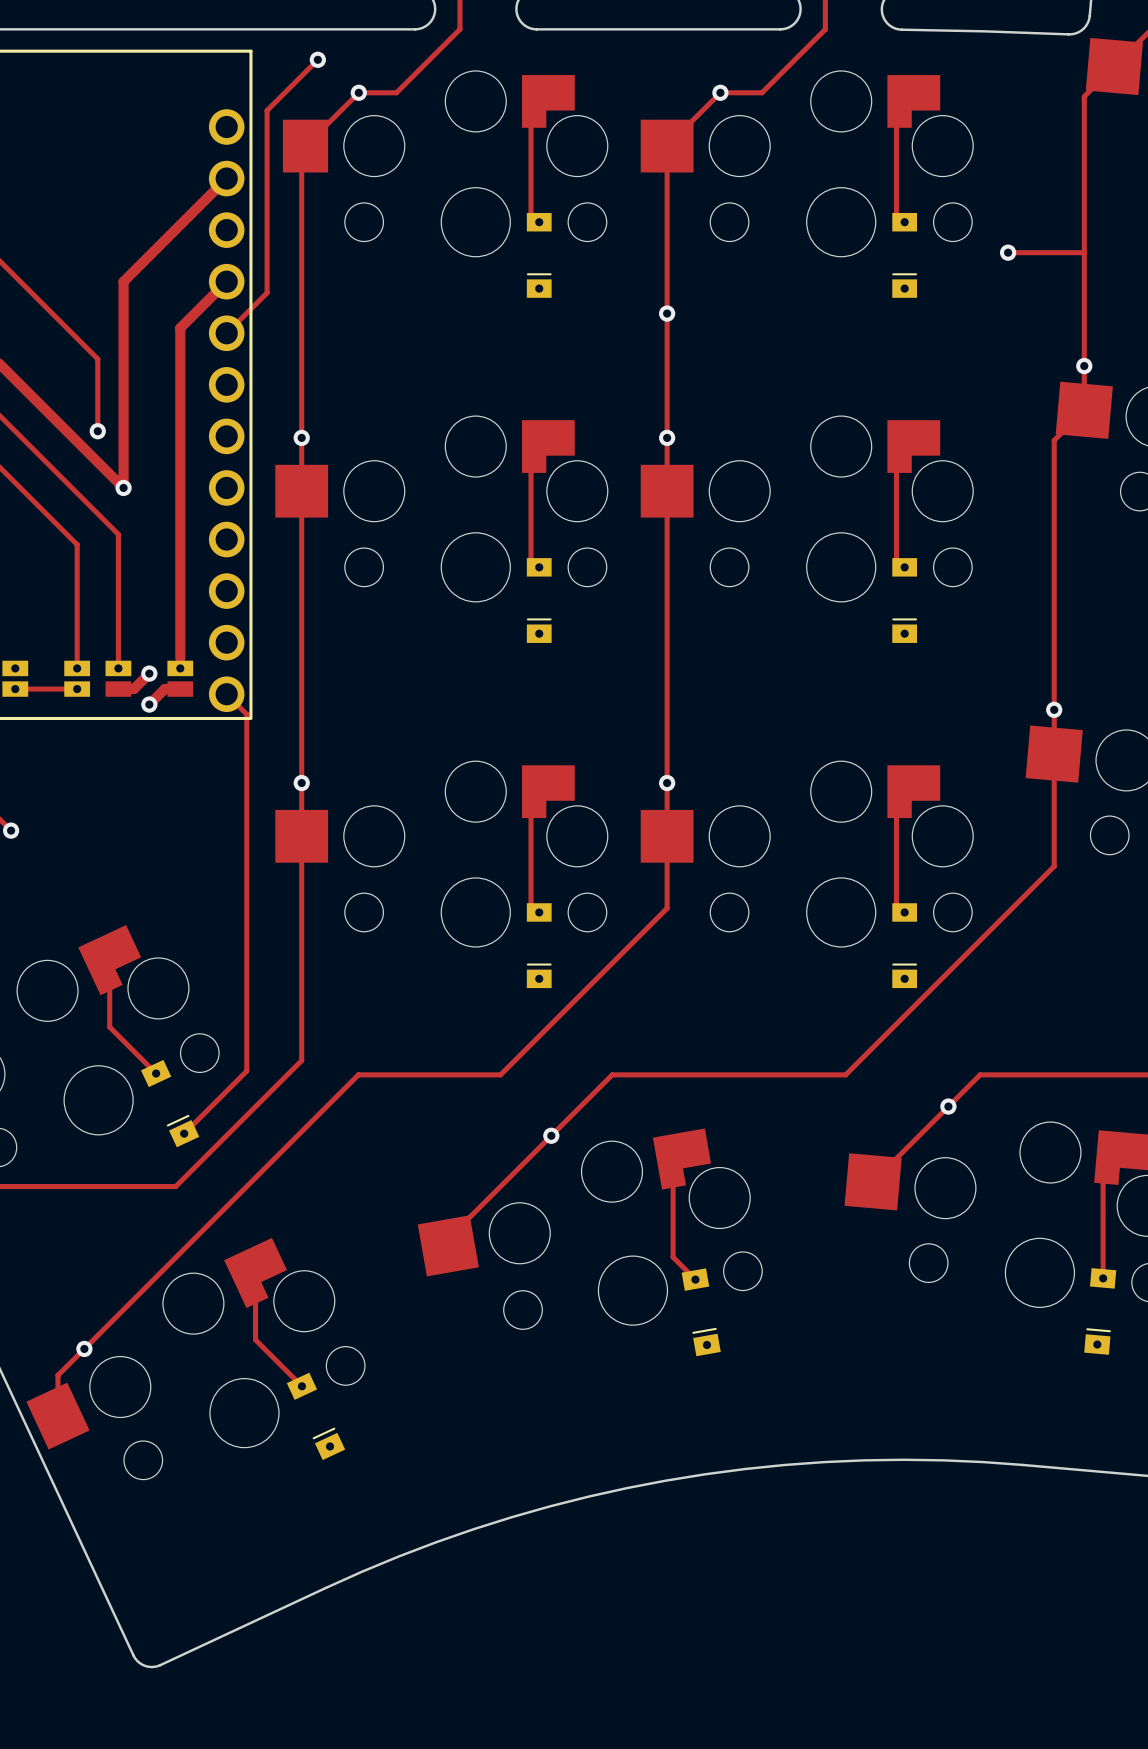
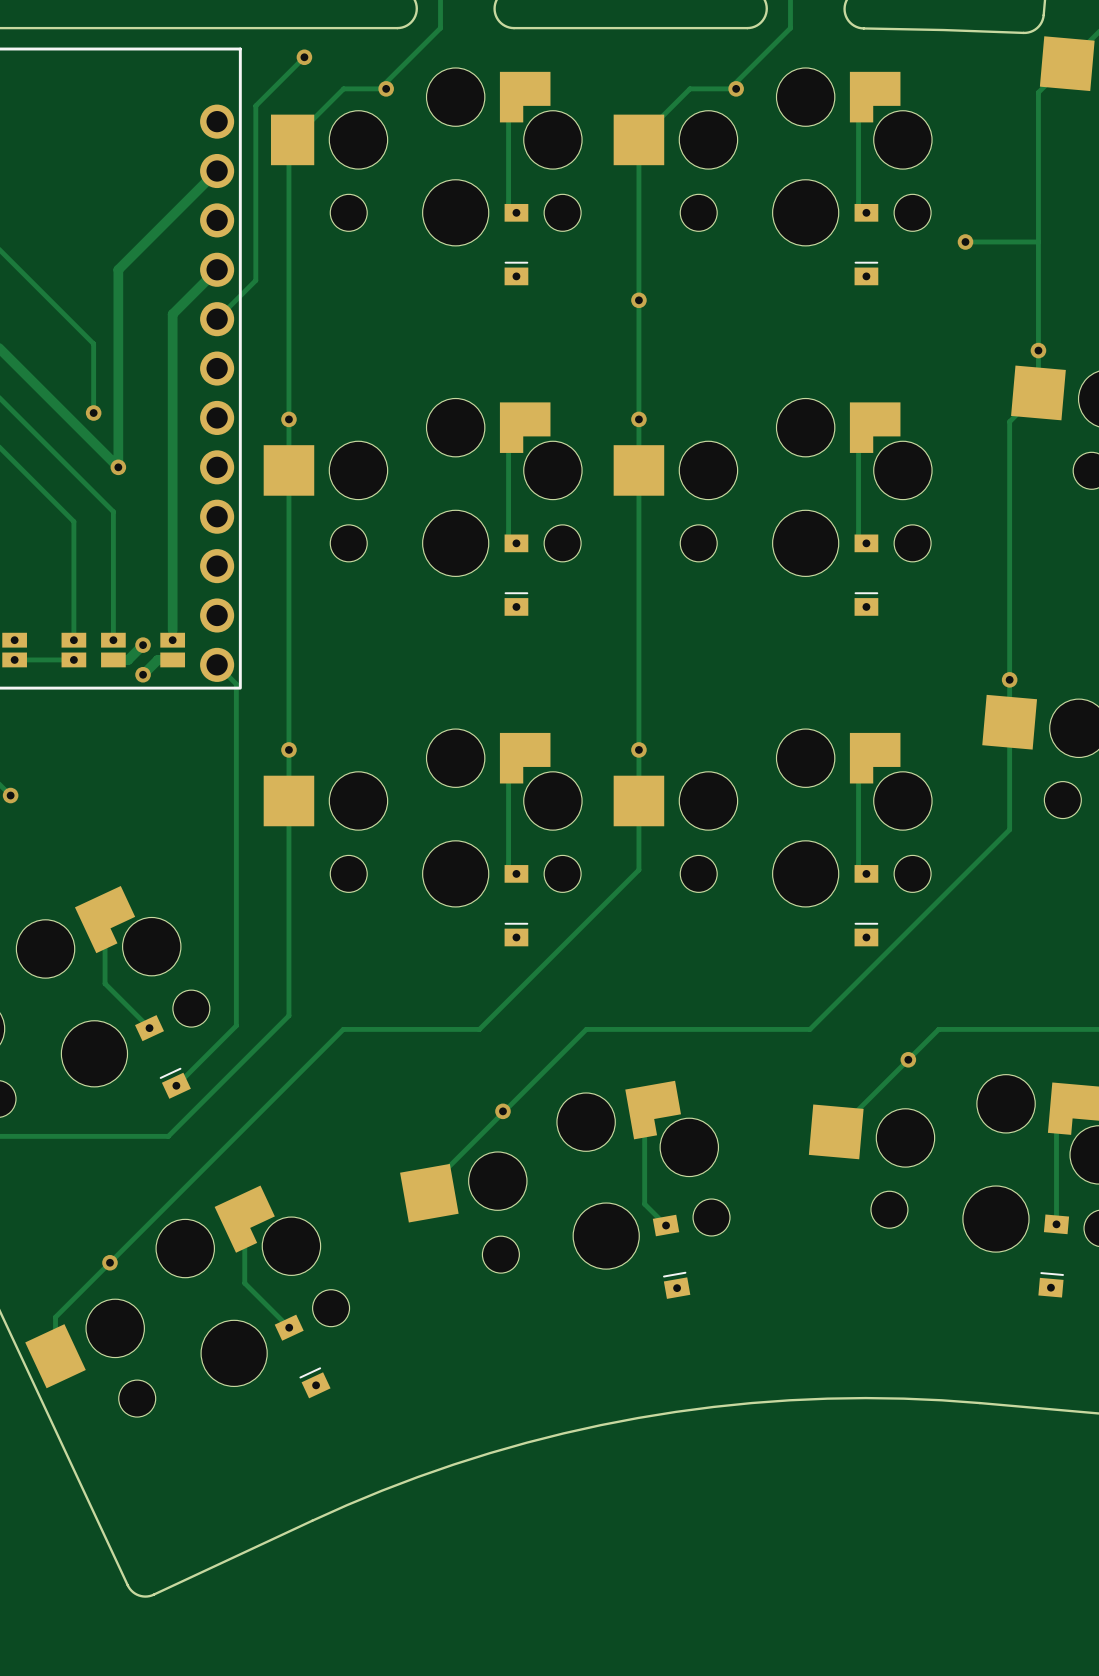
via position: (358, 92) -> (386, 88)
via position: (720, 92) -> (736, 88)
via position: (551, 1135) -> (502, 1111)
via position: (84, 1348) -> (109, 1262)

